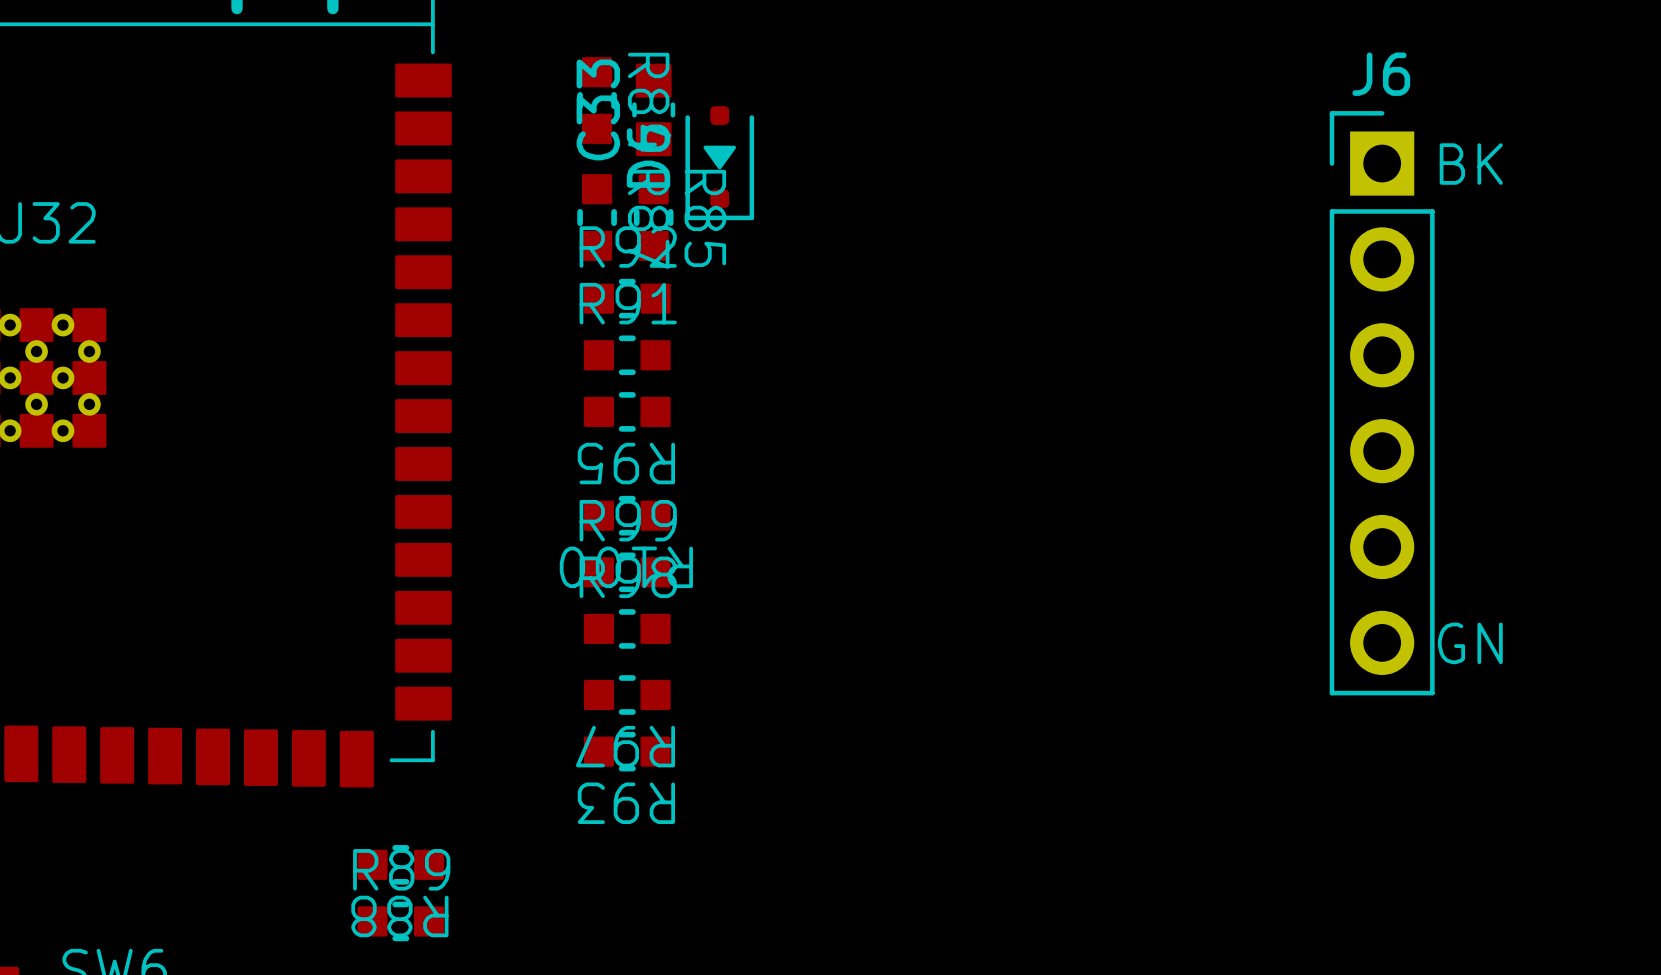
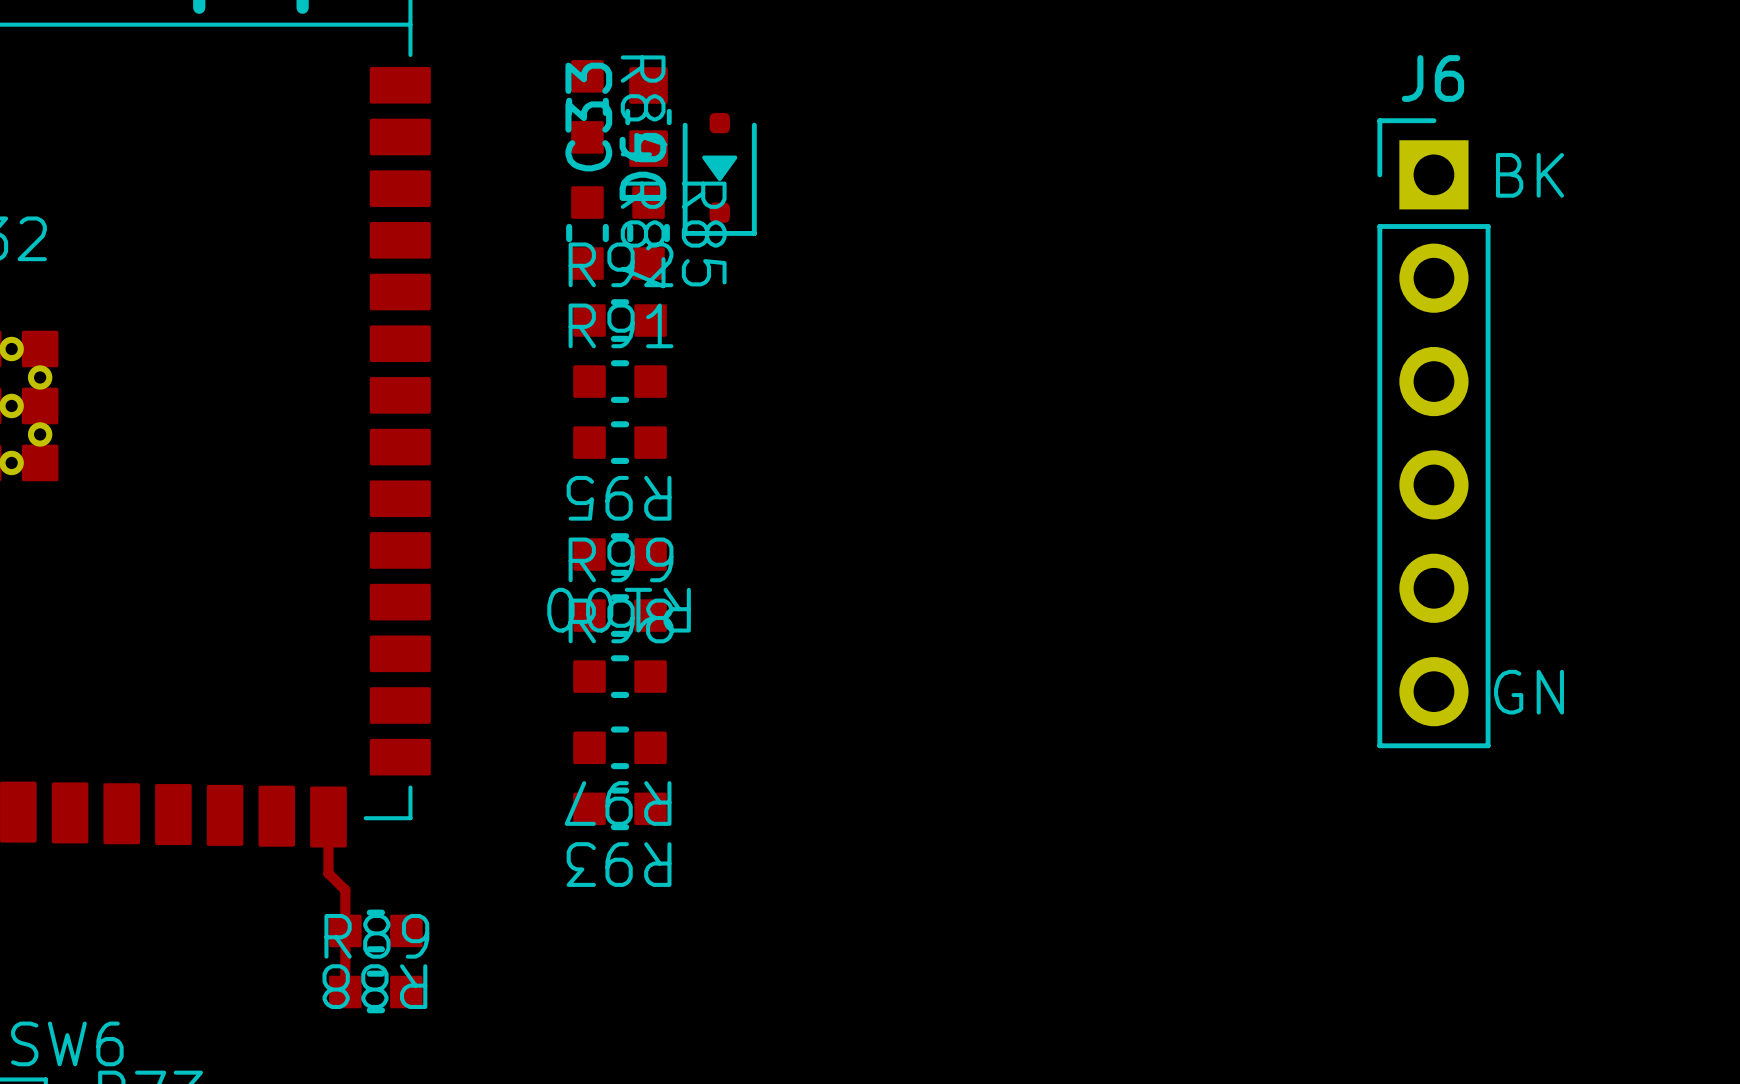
top track: none -> (328, 817) (328, 873) (345, 890) (345, 991)

